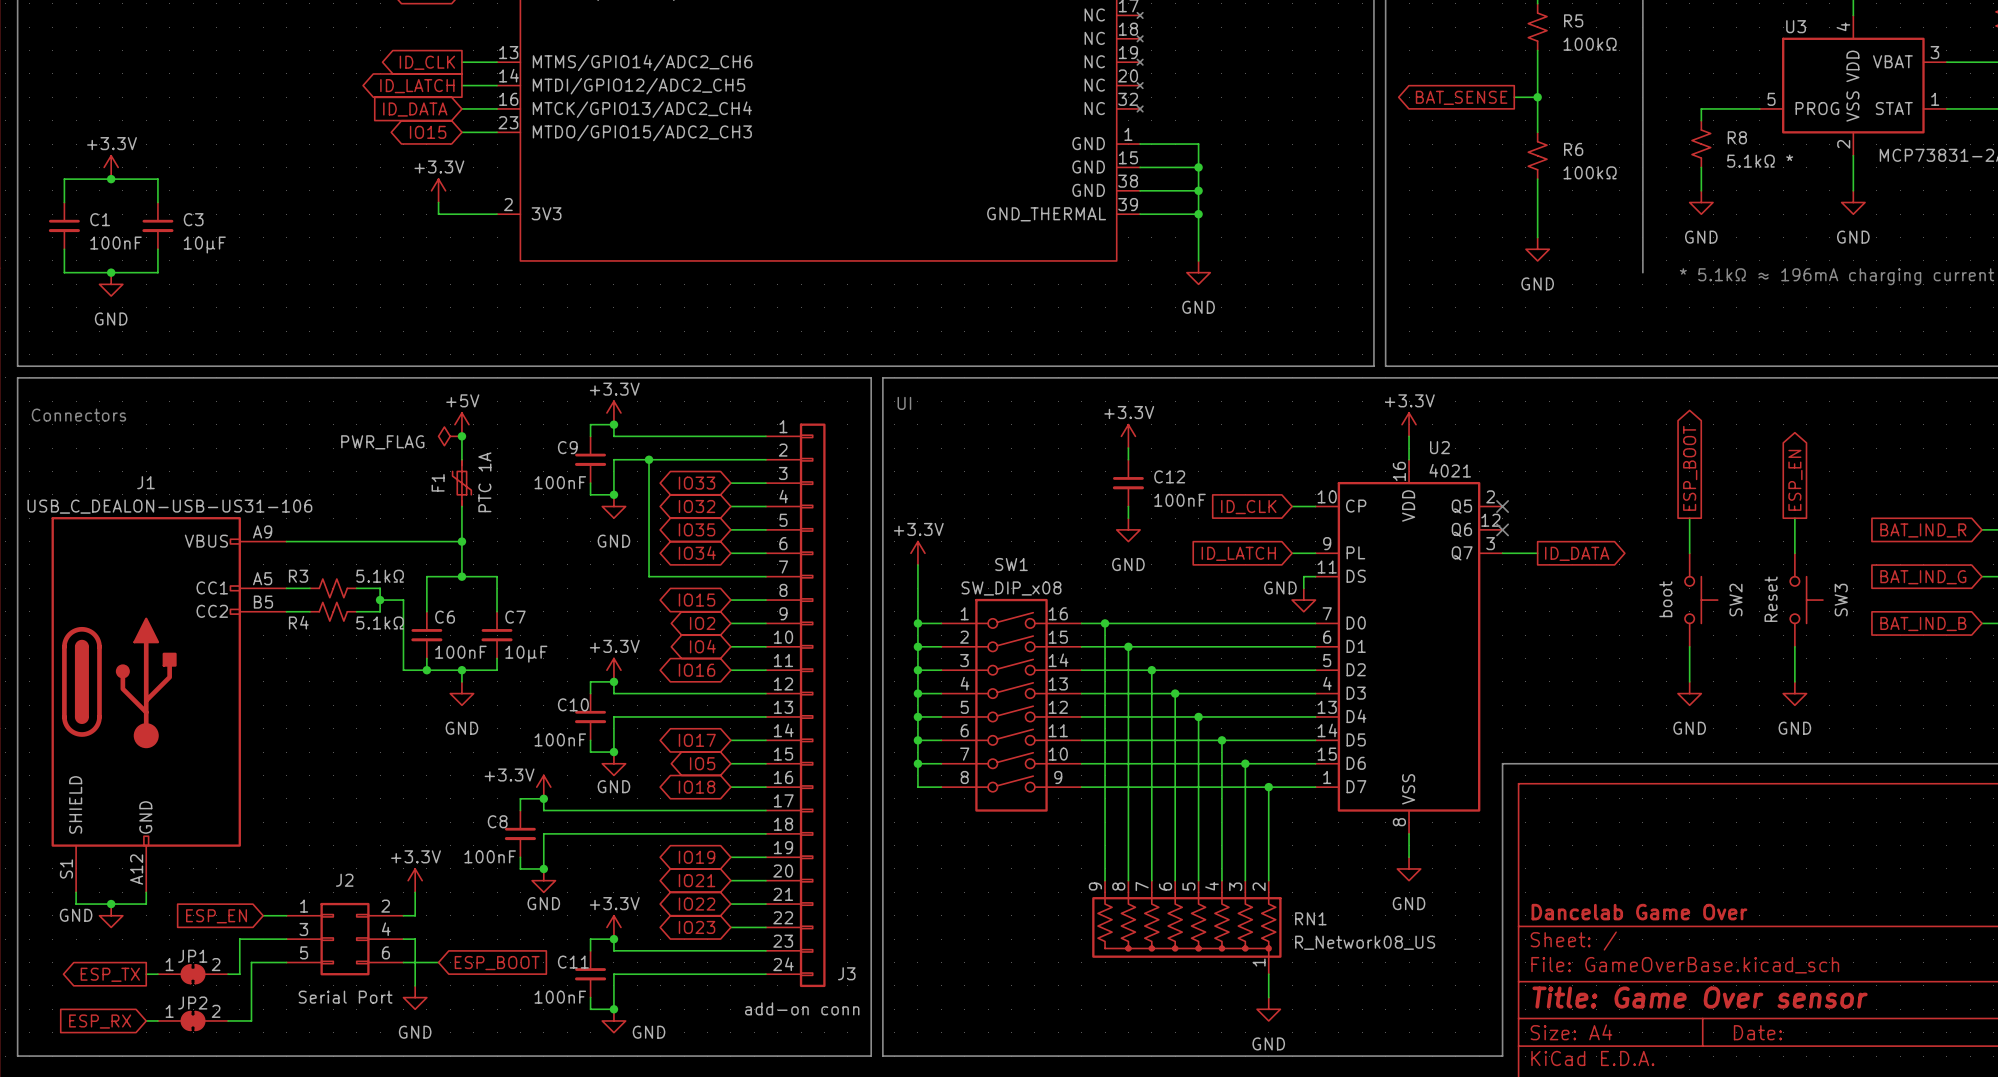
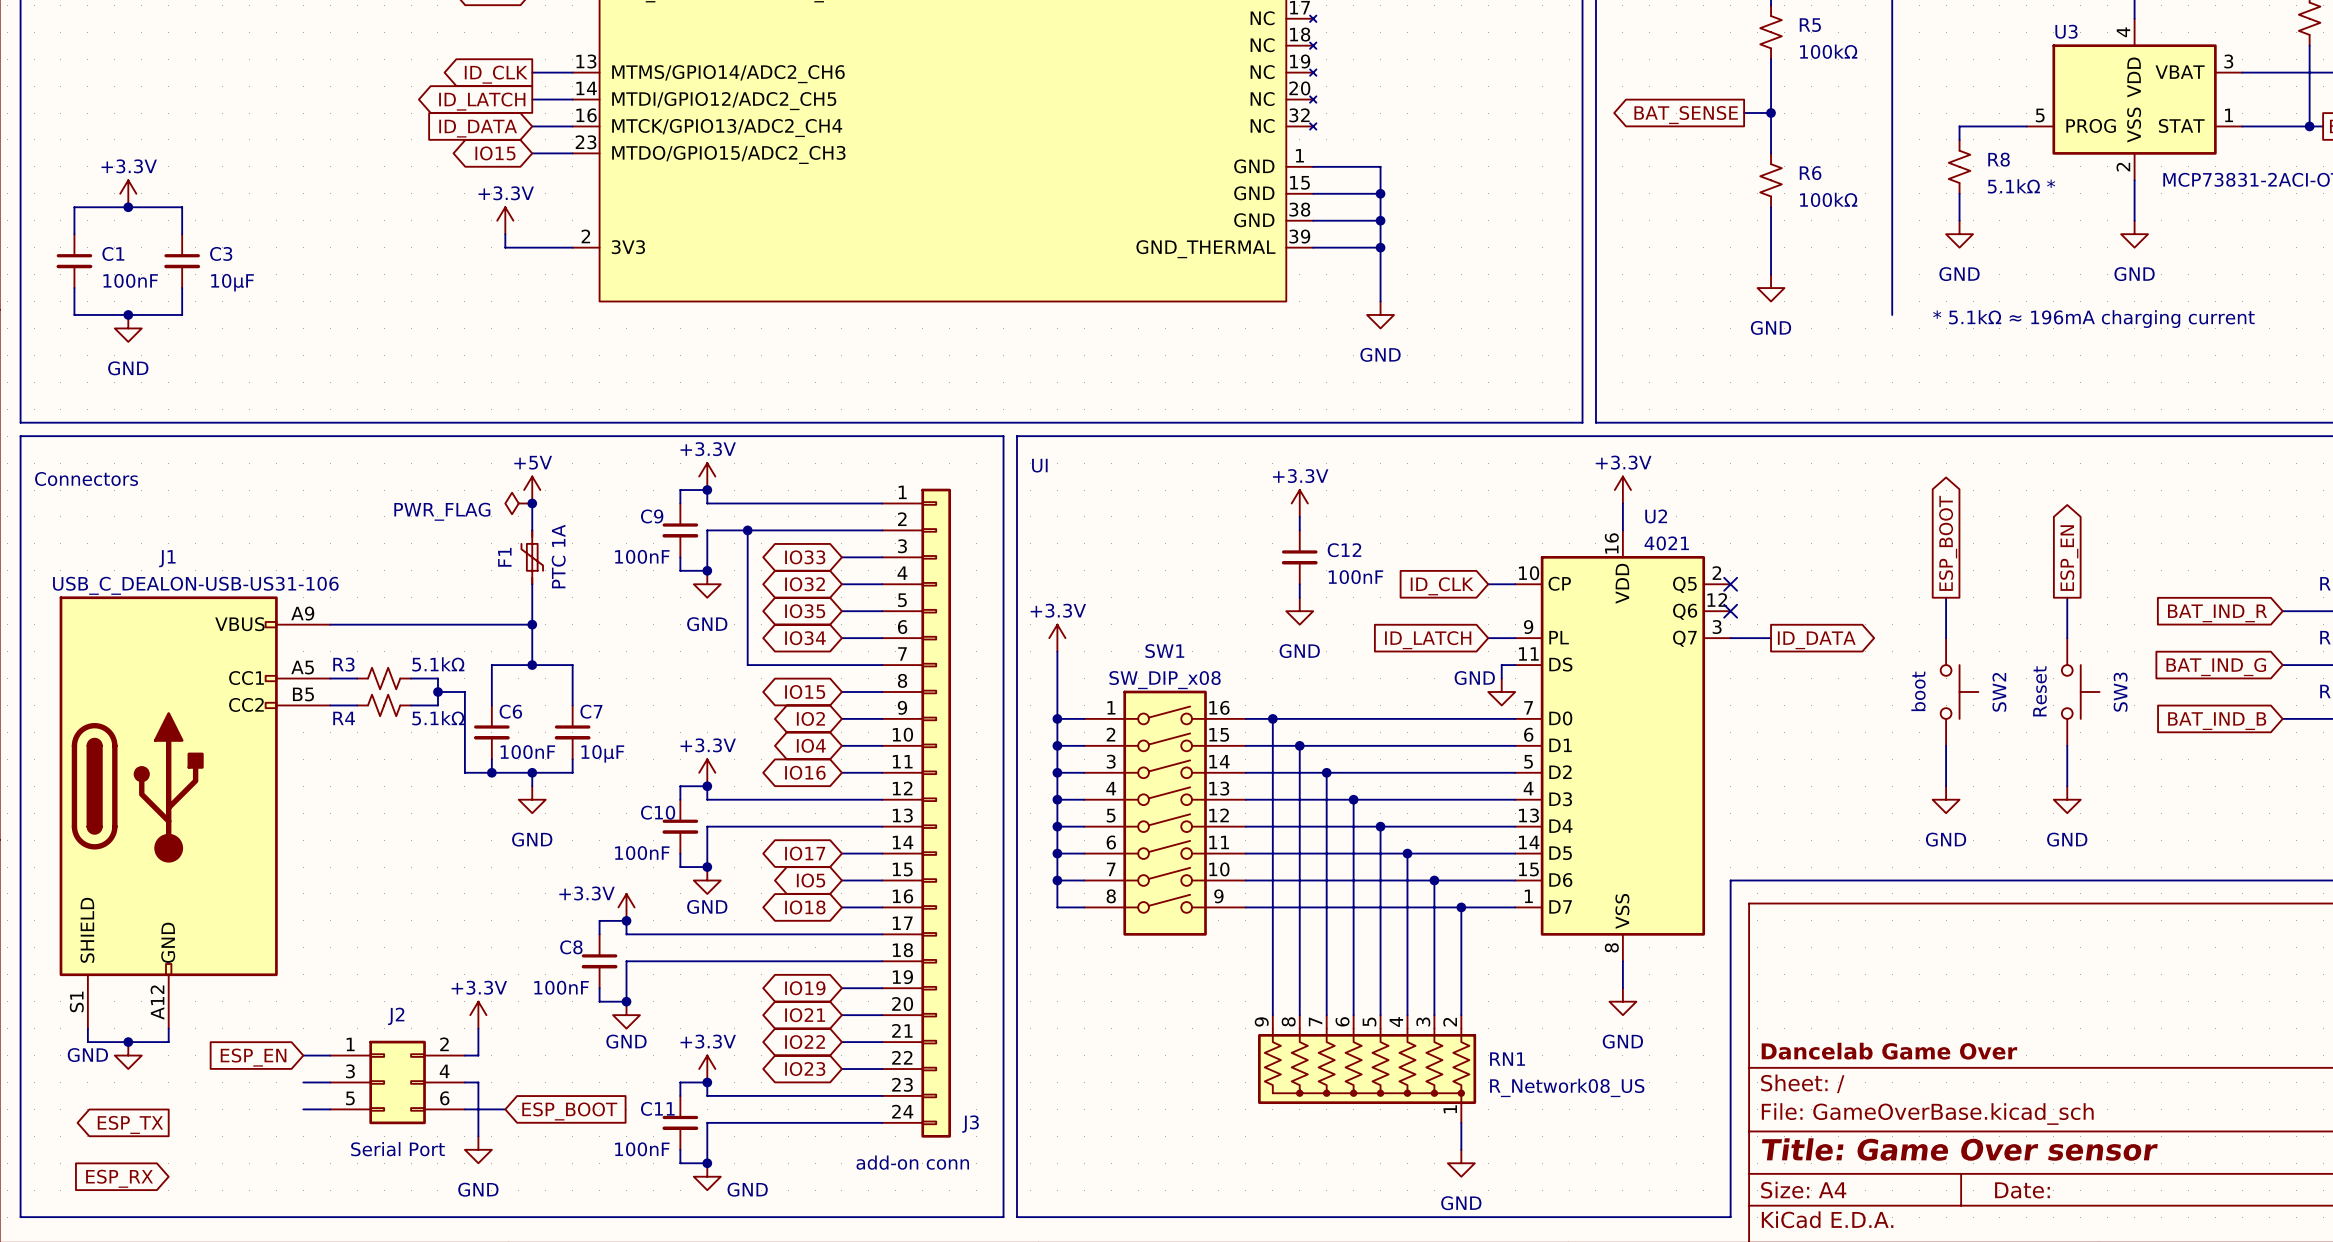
wire: (263, 939) (239, 939) (239, 974) (228, 974) -> none
wire: (263, 962) (251, 962) (251, 1020) (228, 1020) -> none
wire: (146, 974) (157, 974) -> none
JP1: (193, 974) -> none
wire: (146, 1020) (157, 1020) -> none
JP2: (193, 1020) -> none

